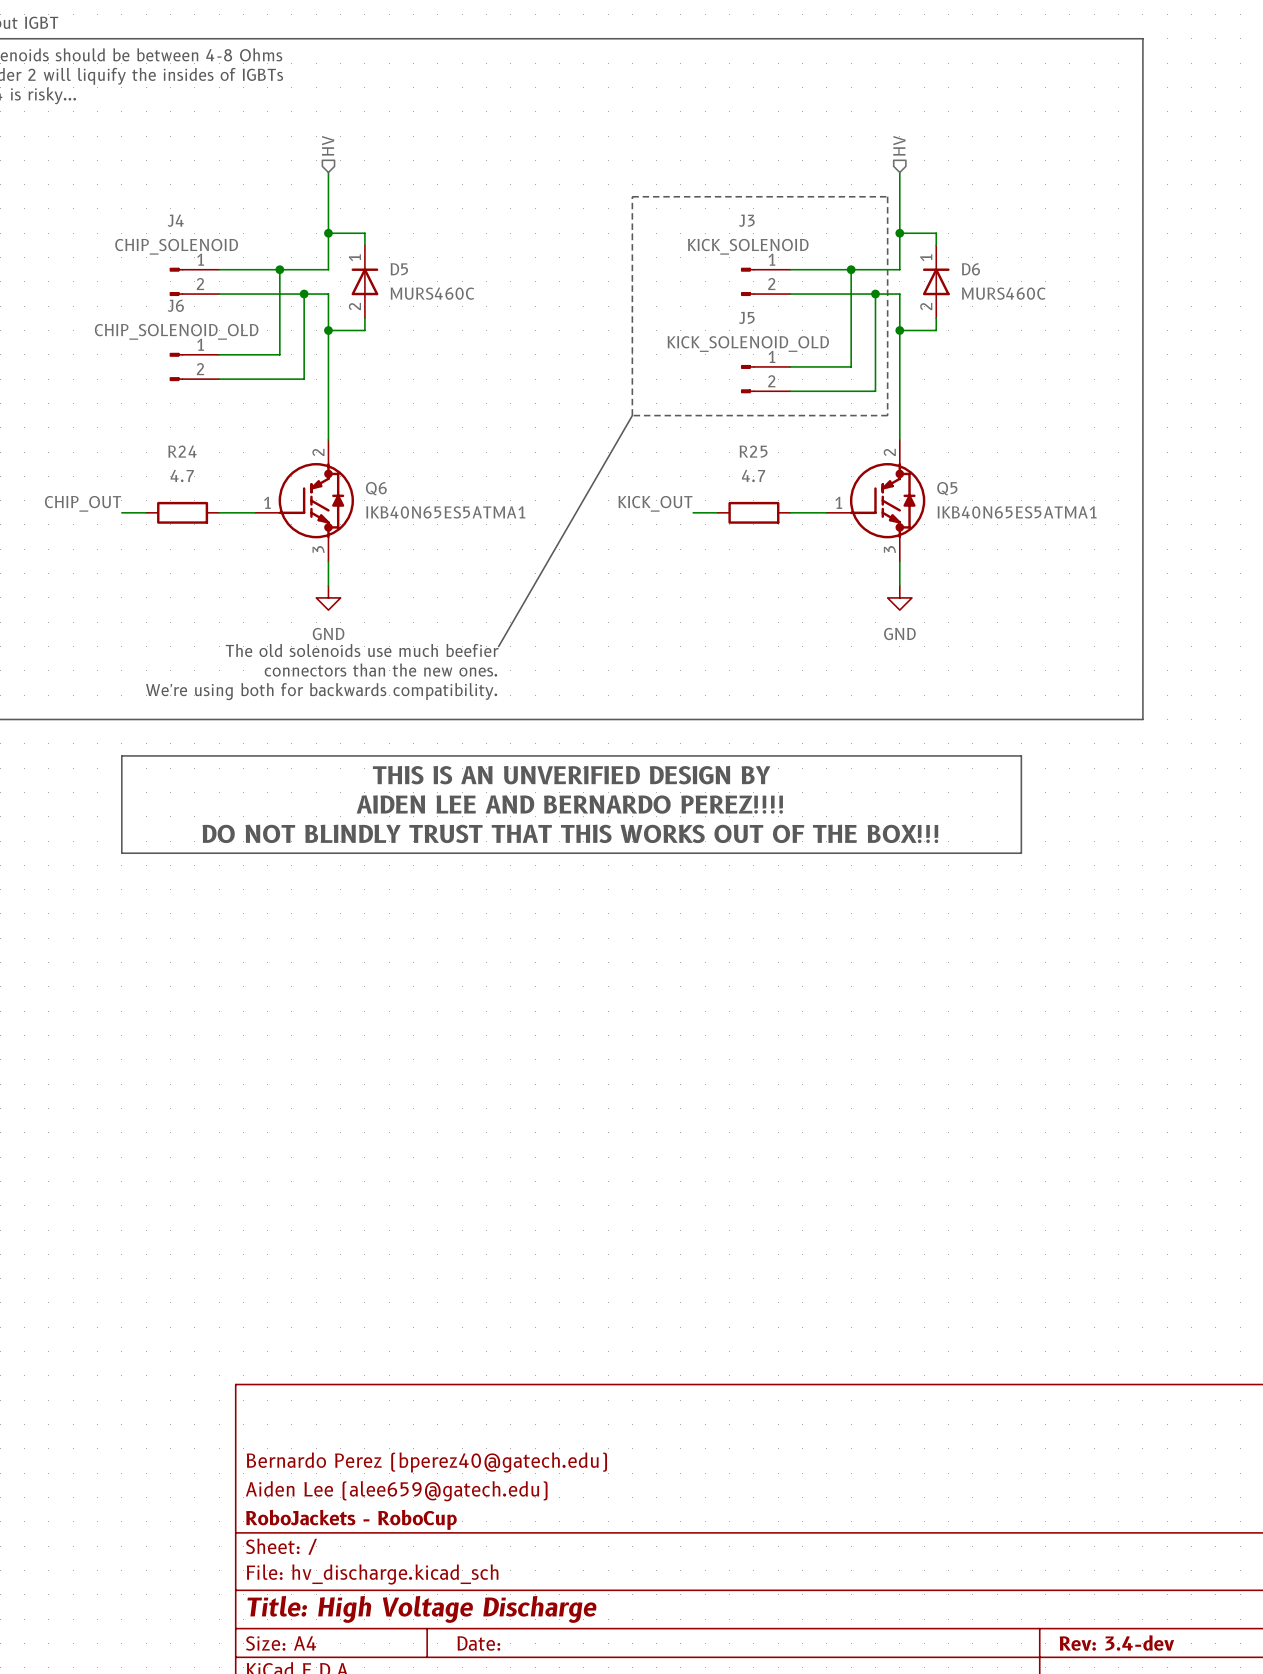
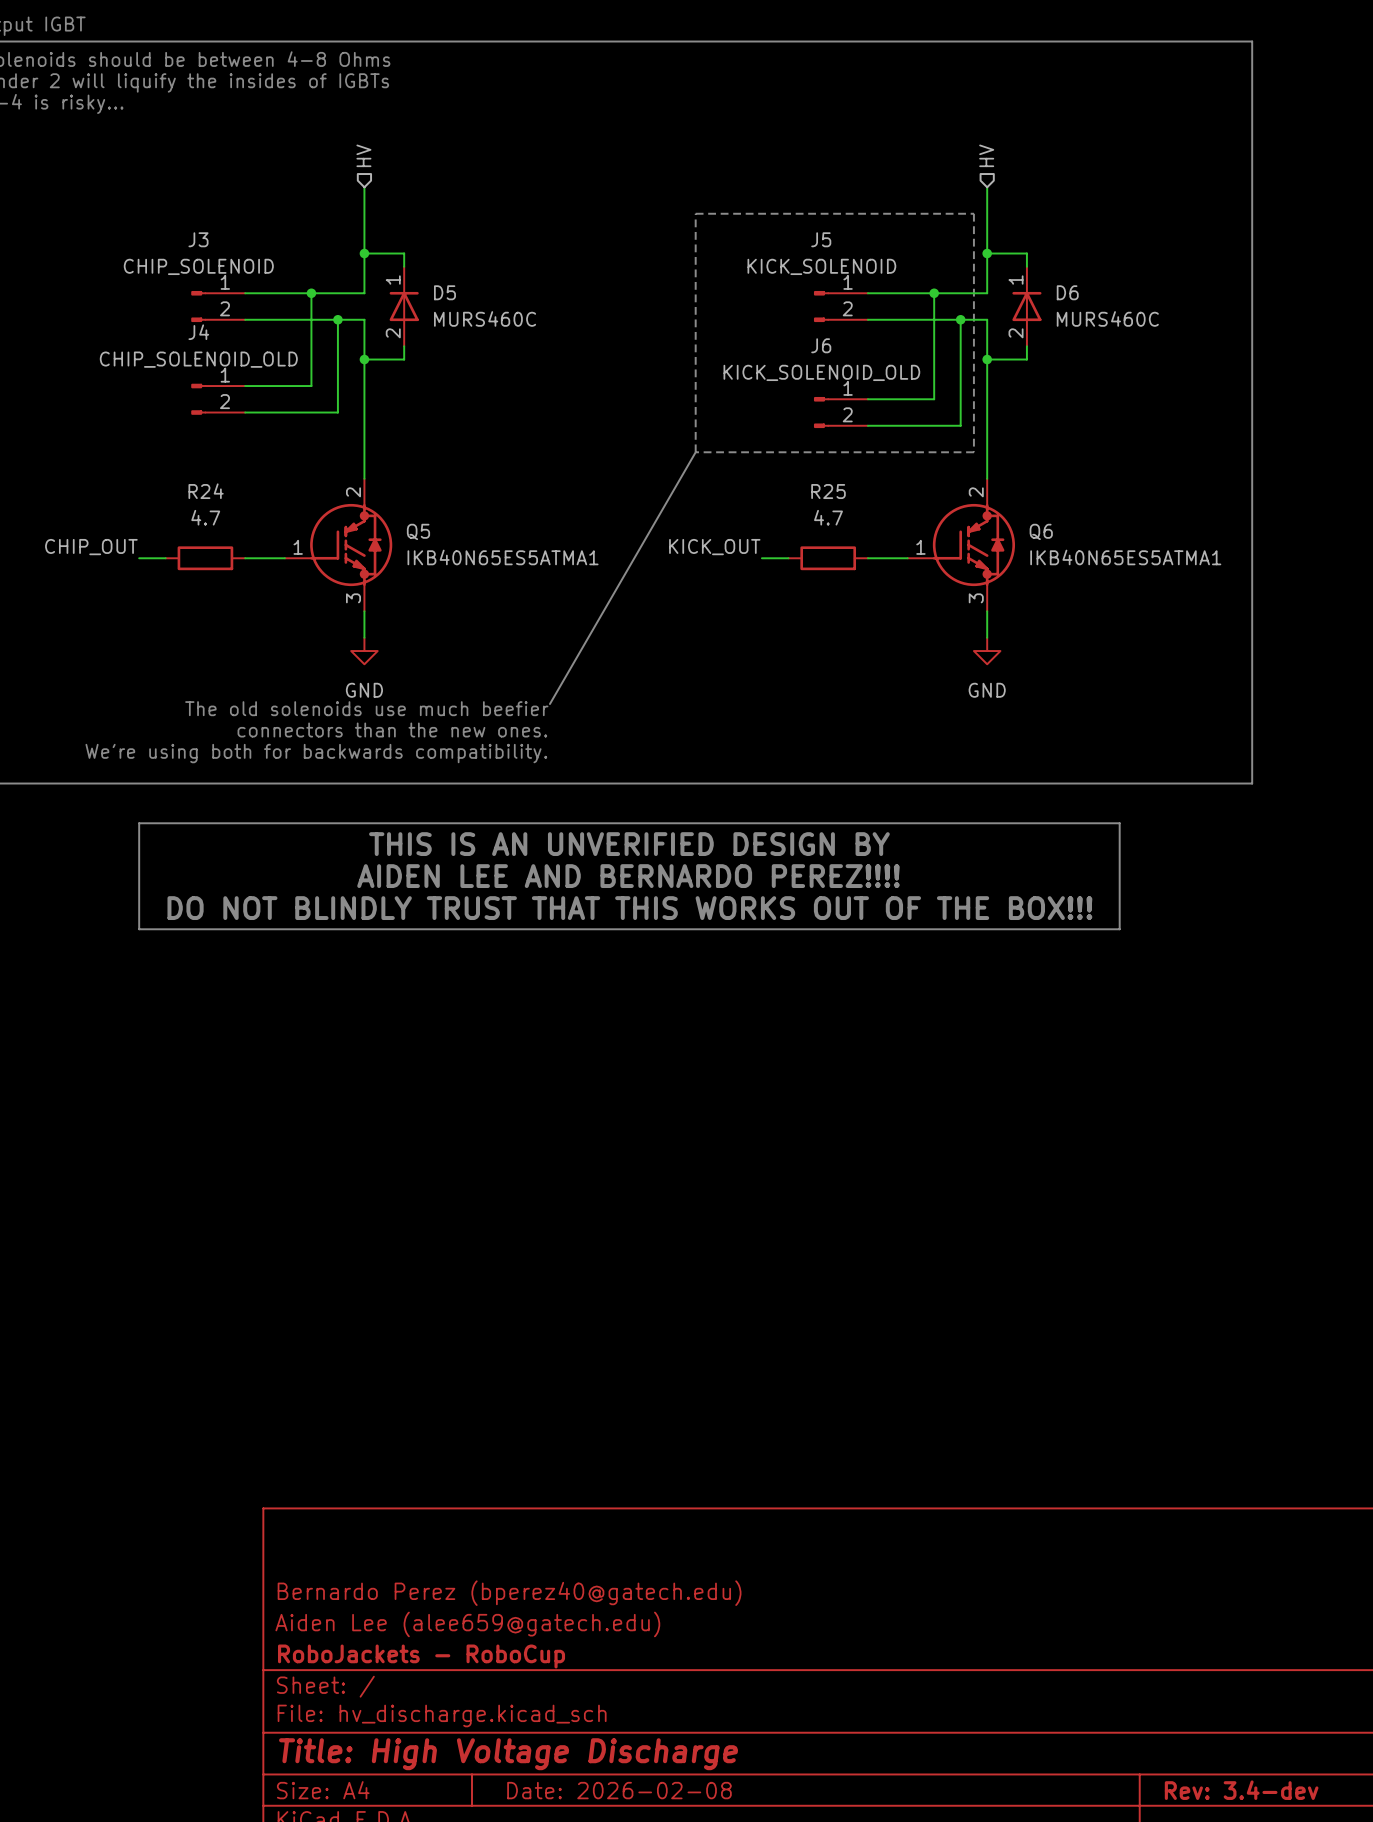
J4 name: J4 (175, 220) -> J3 (198, 239)
J3 name: J3 (746, 220) -> J5 (821, 239)
J6 name: J6 (175, 305) -> J4 (198, 332)
J5 name: J5 (746, 317) -> J6 (821, 345)
Q6 name: Q6 (376, 488) -> Q5 (418, 531)
Q5 name: Q5 (947, 488) -> Q6 (1041, 531)
title block: Date: (478, 1643) -> Date: 2026-02-08 (619, 1790)

